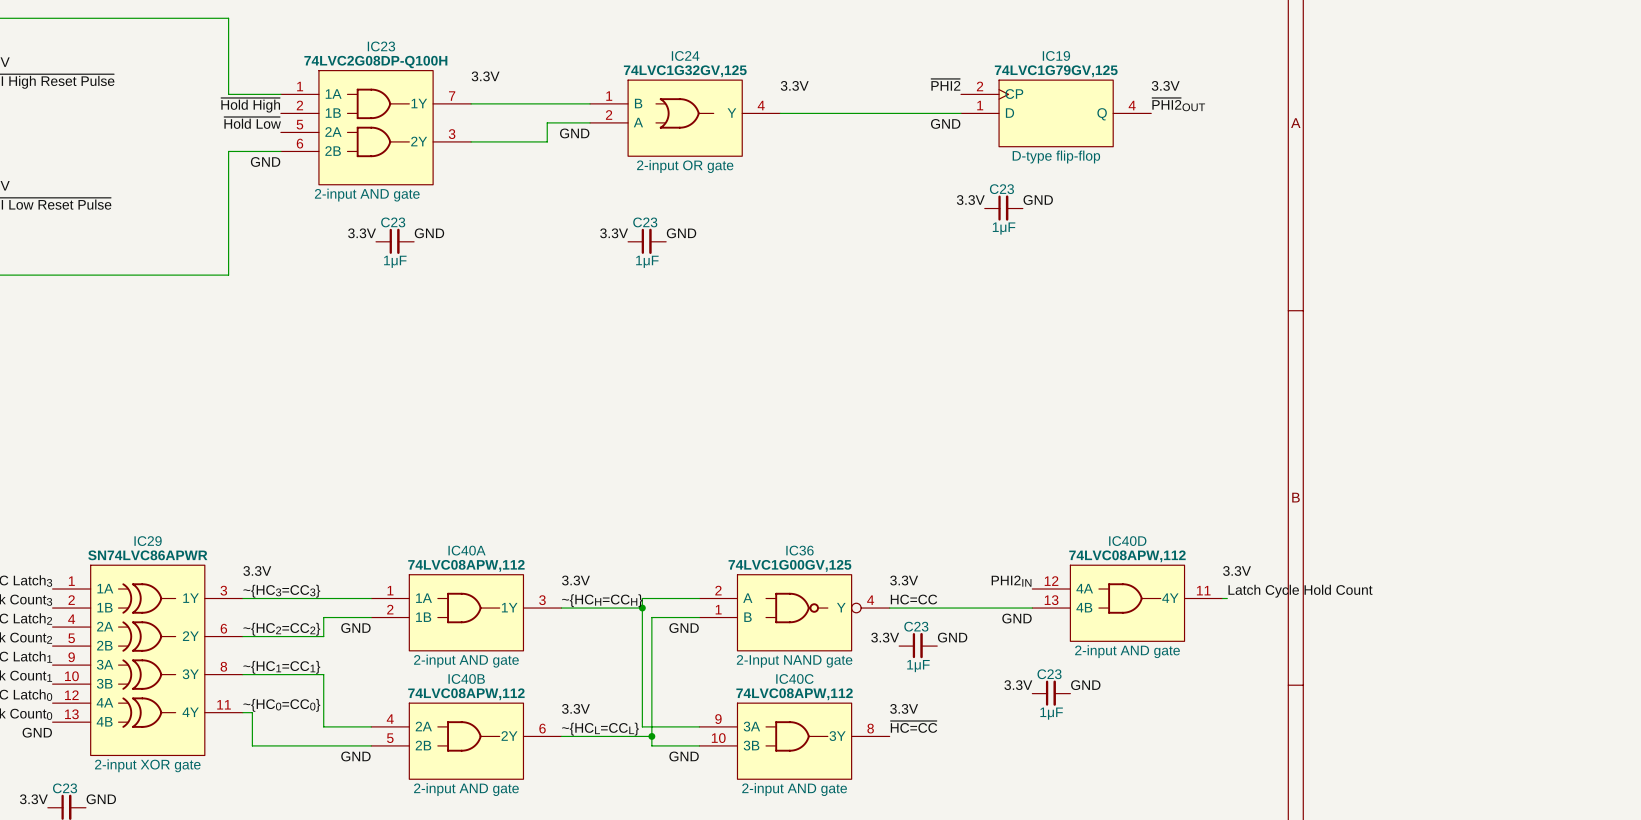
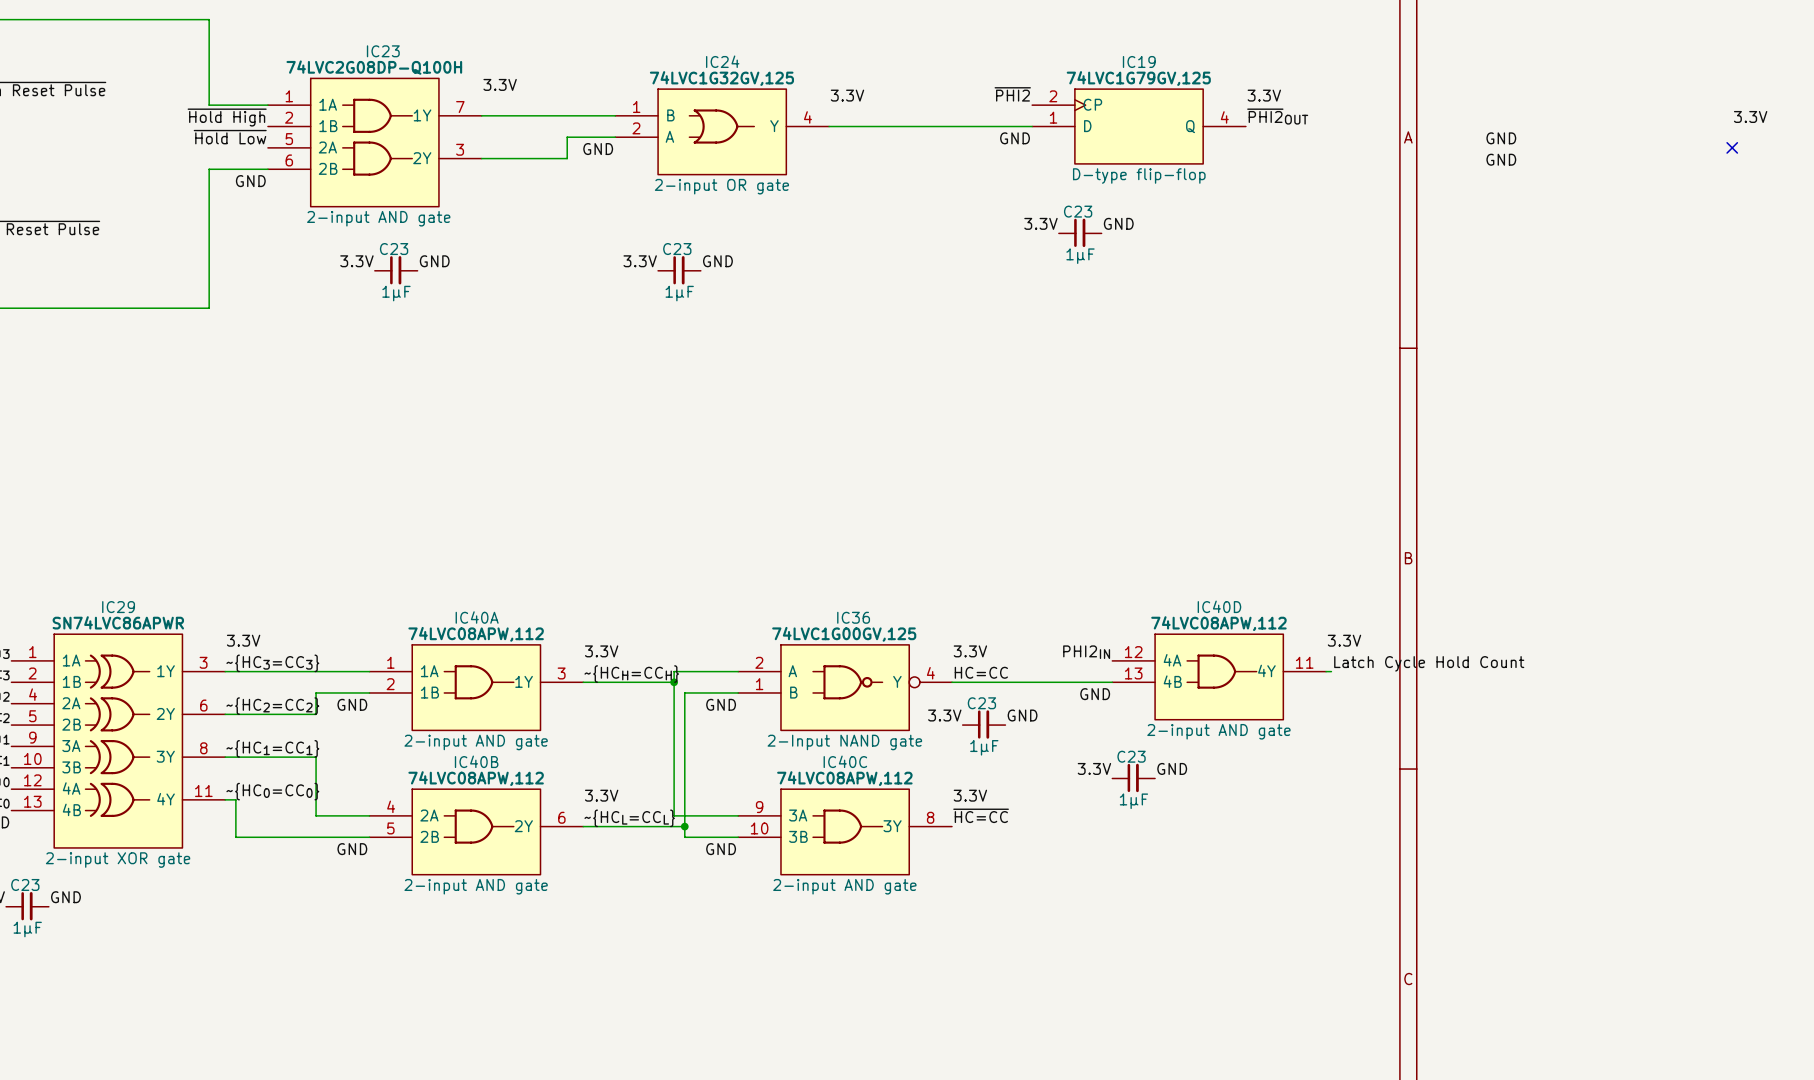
label: none -> 3.3V (1750, 116)
label: none -> GND (1501, 138)
no-connect mark: none -> (1732, 147)
label: none -> GND (1501, 159)

